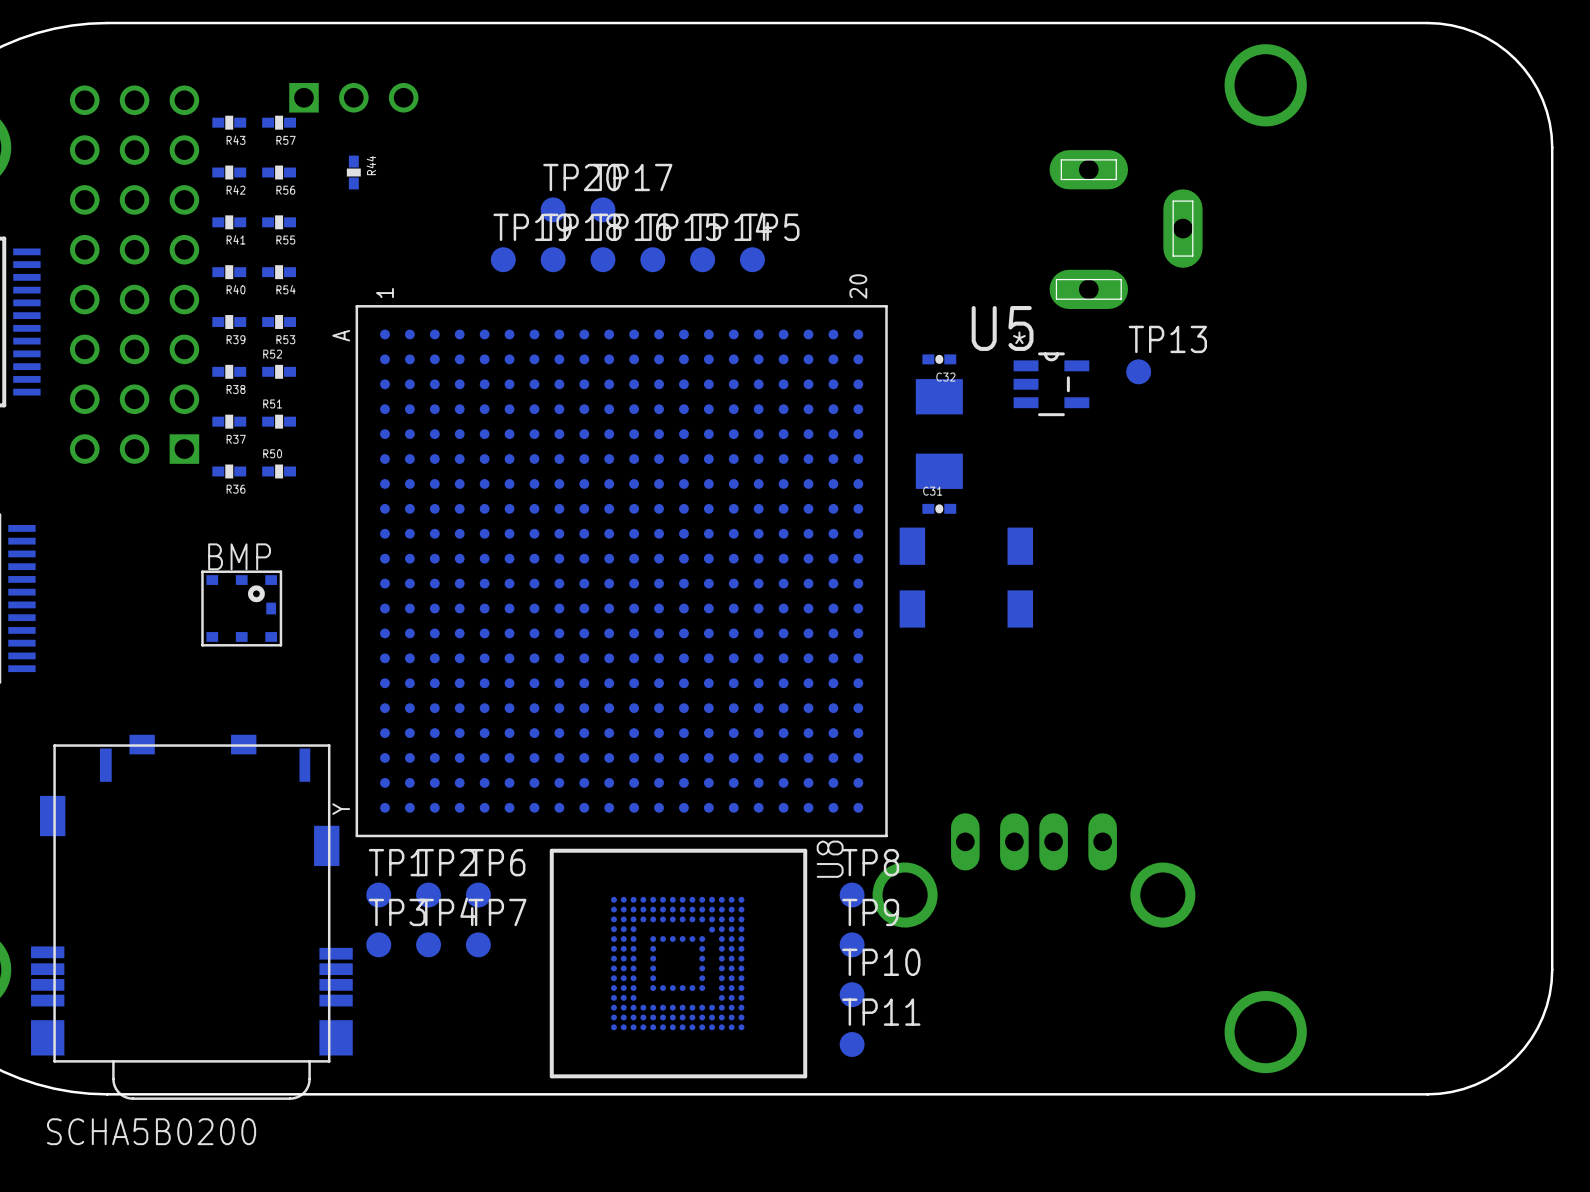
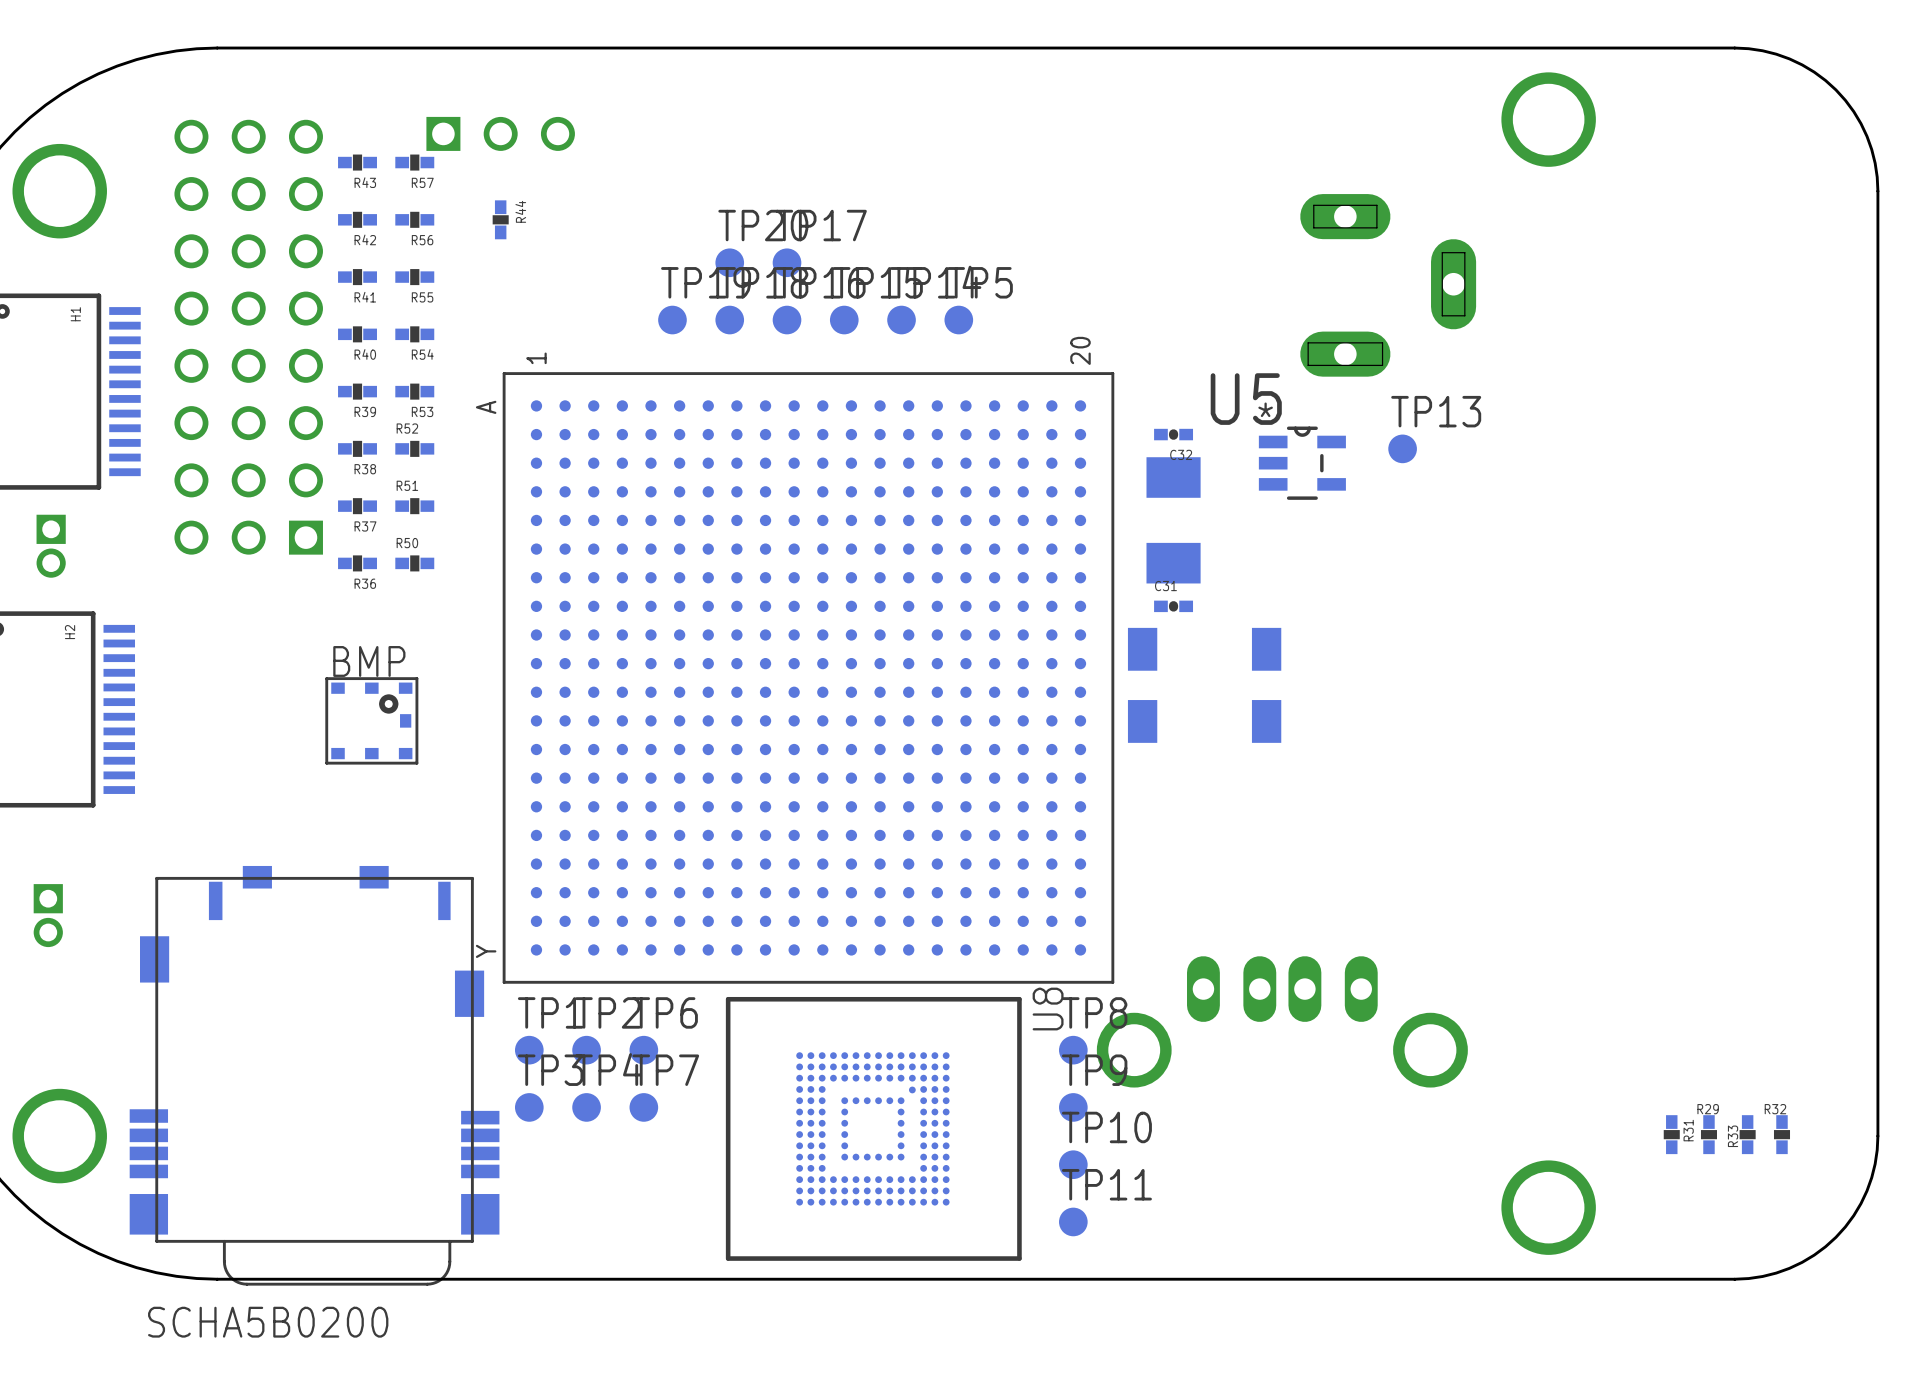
R31: none -> (1671, 1134)
R29: none -> (1708, 1134)
R33: none -> (1747, 1134)
R32: none -> (1781, 1134)

